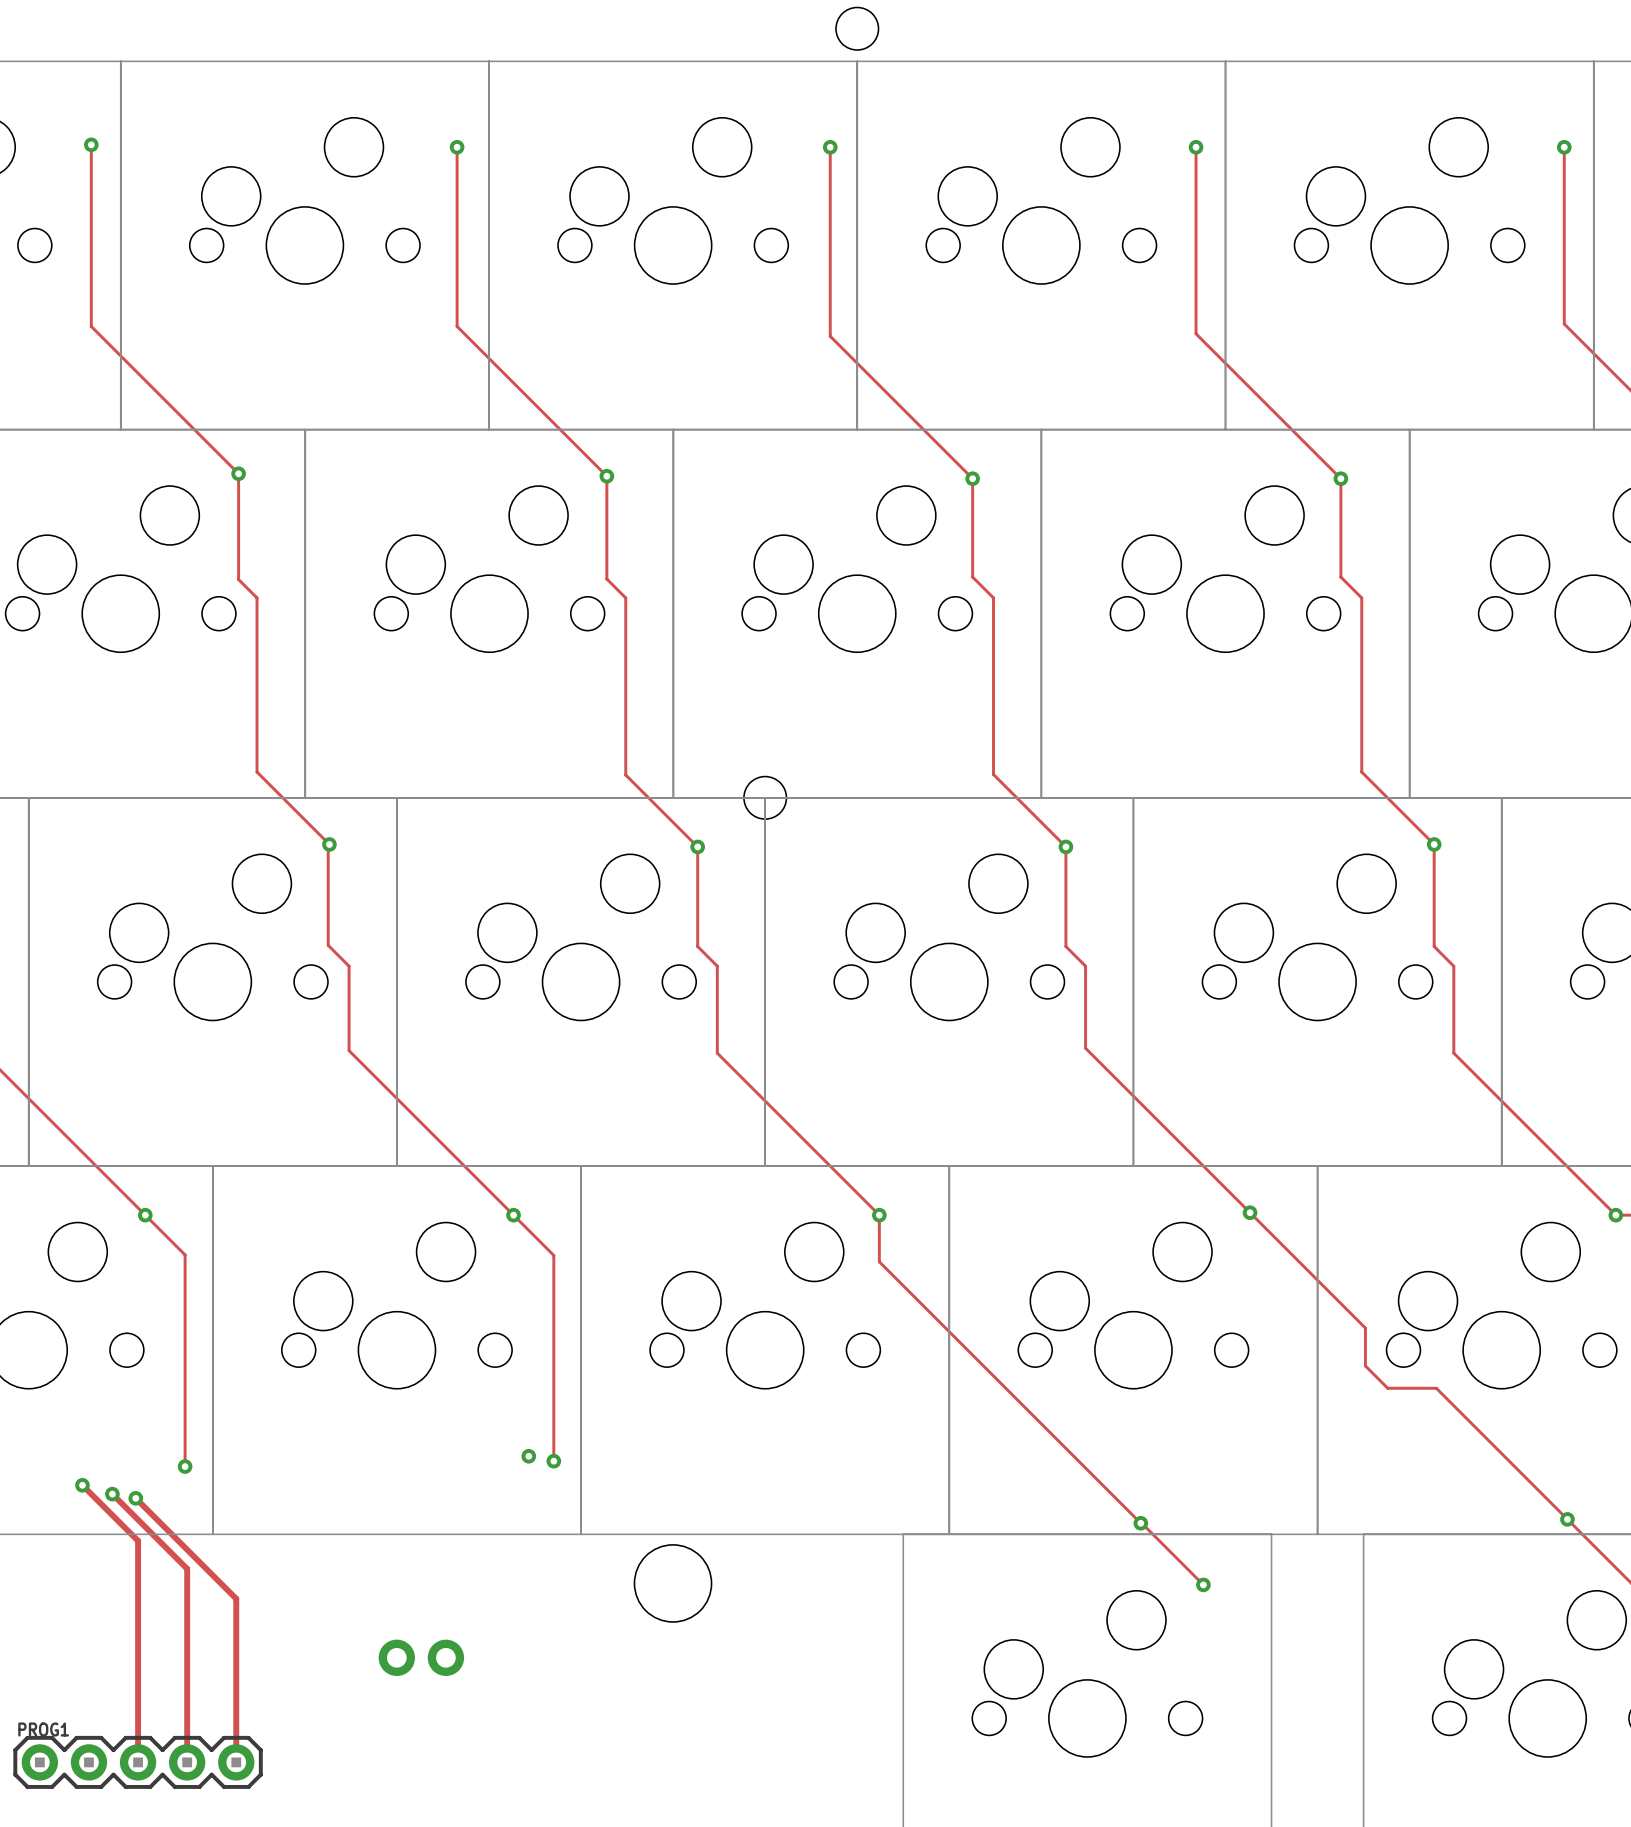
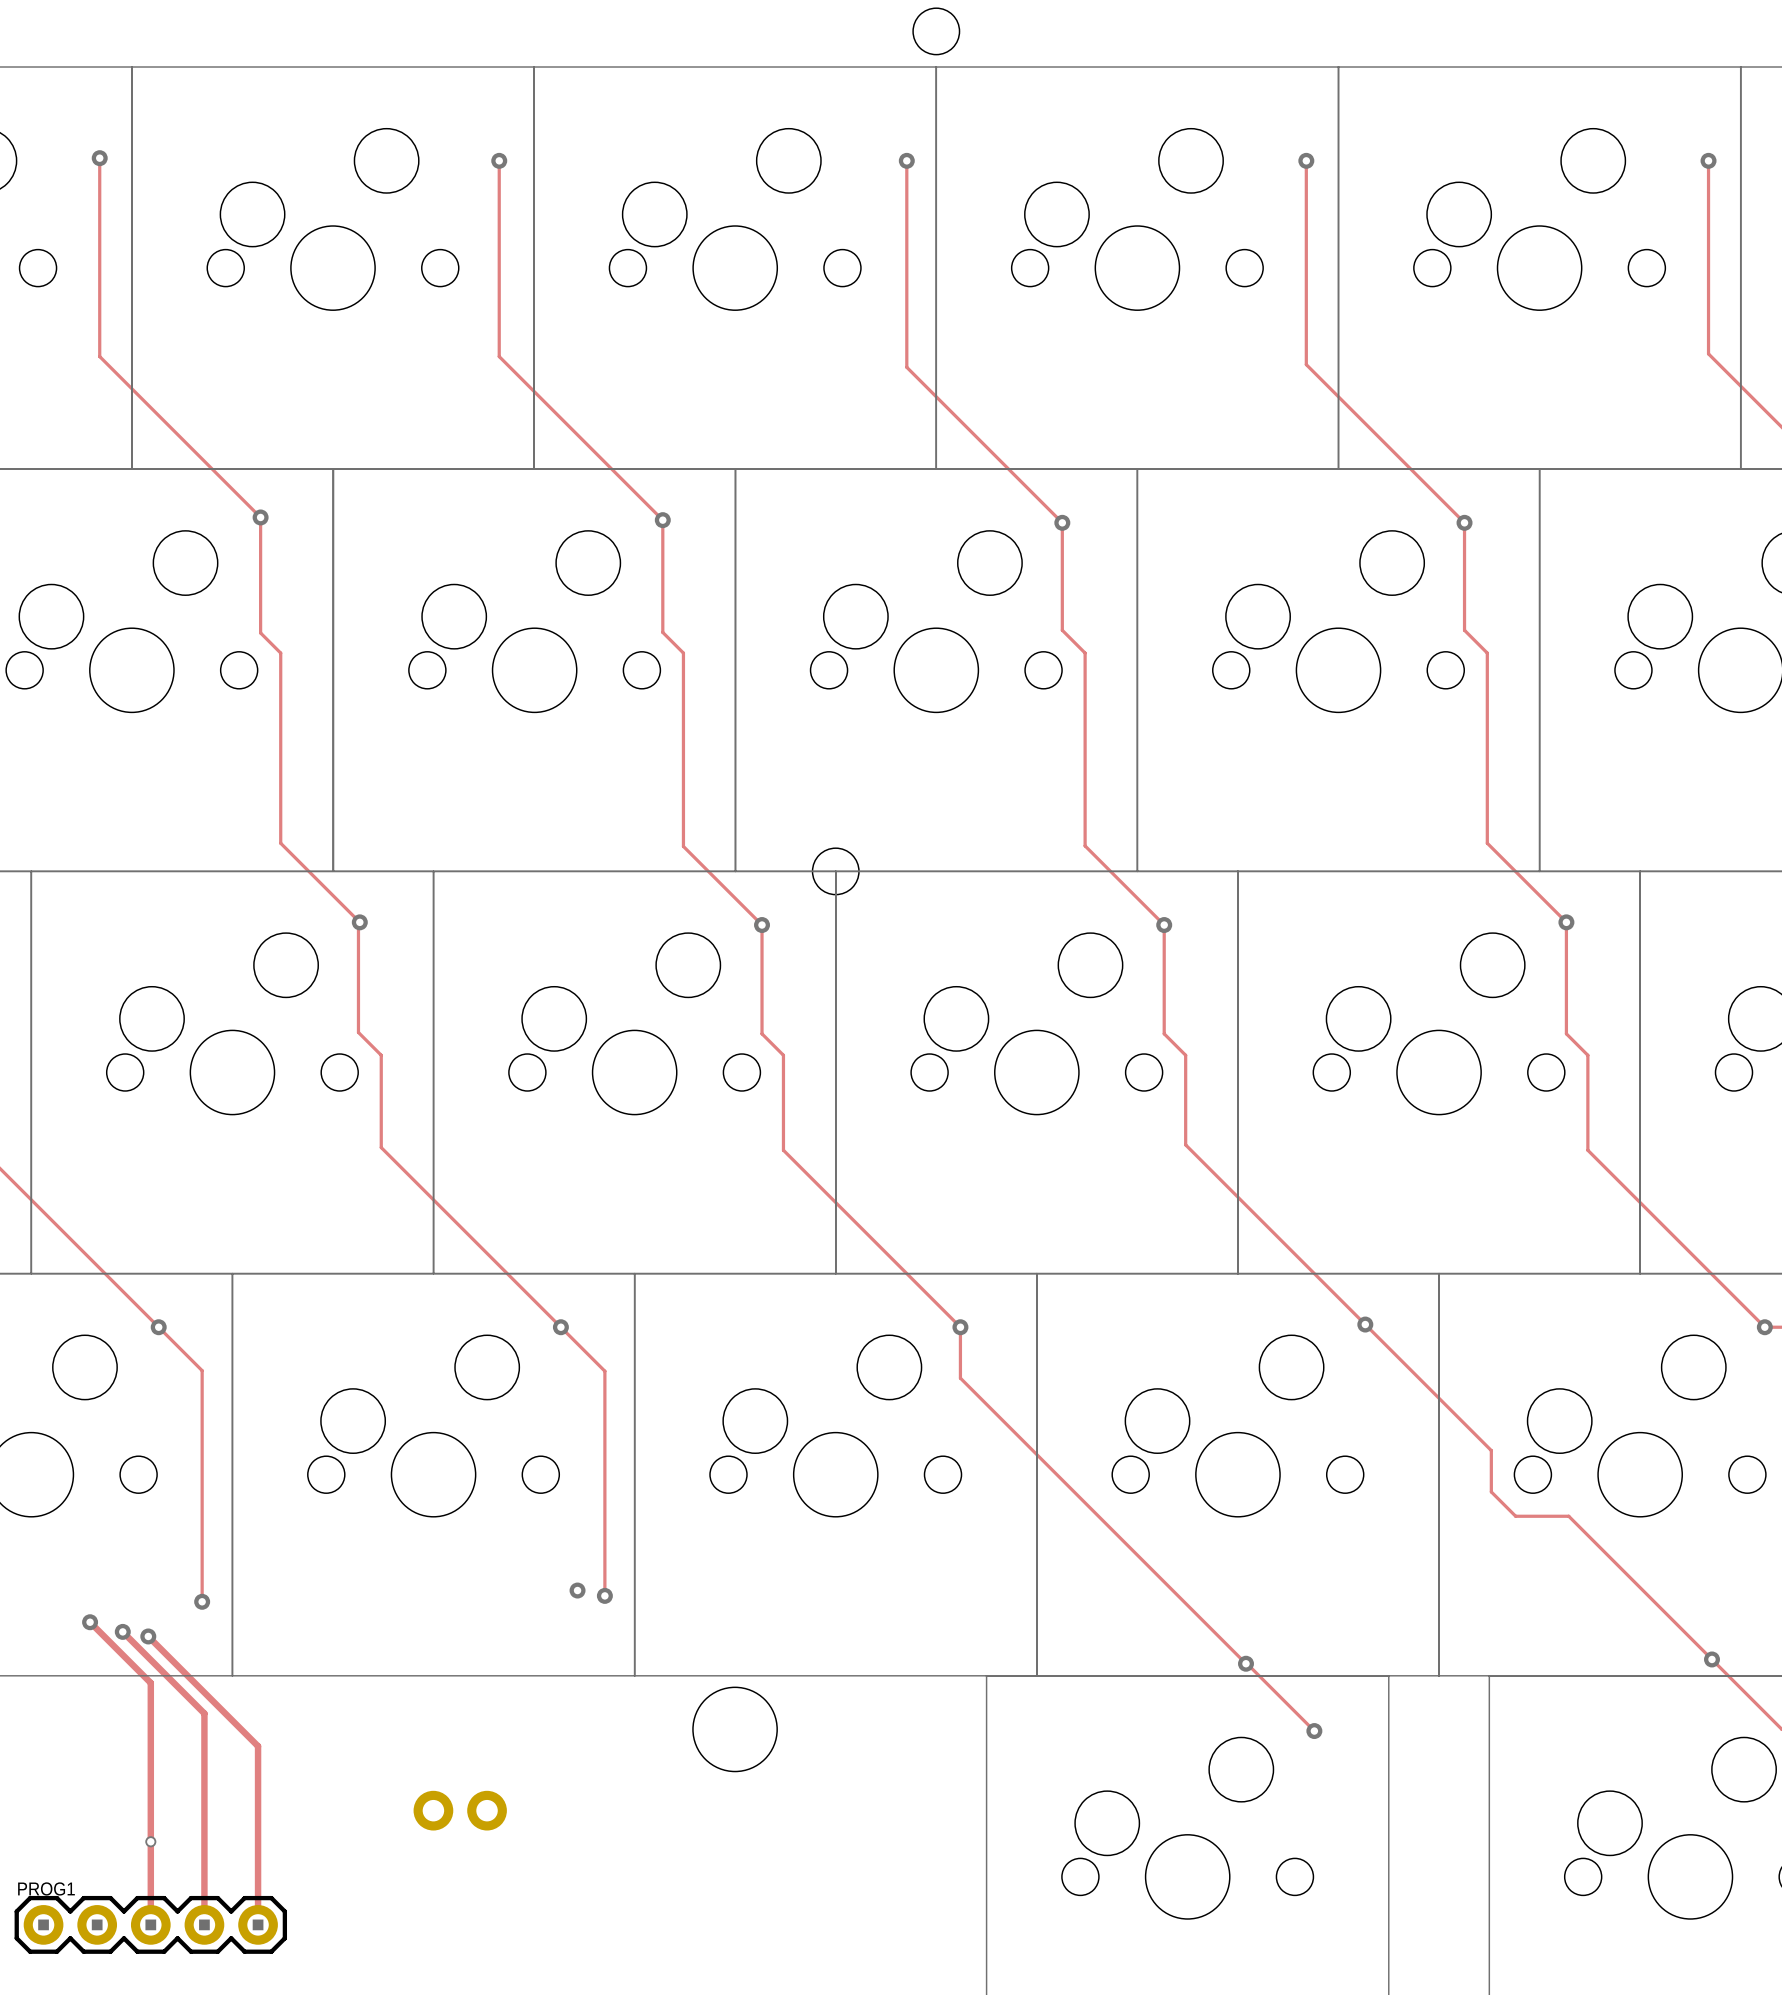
via: none -> (150, 1841)

